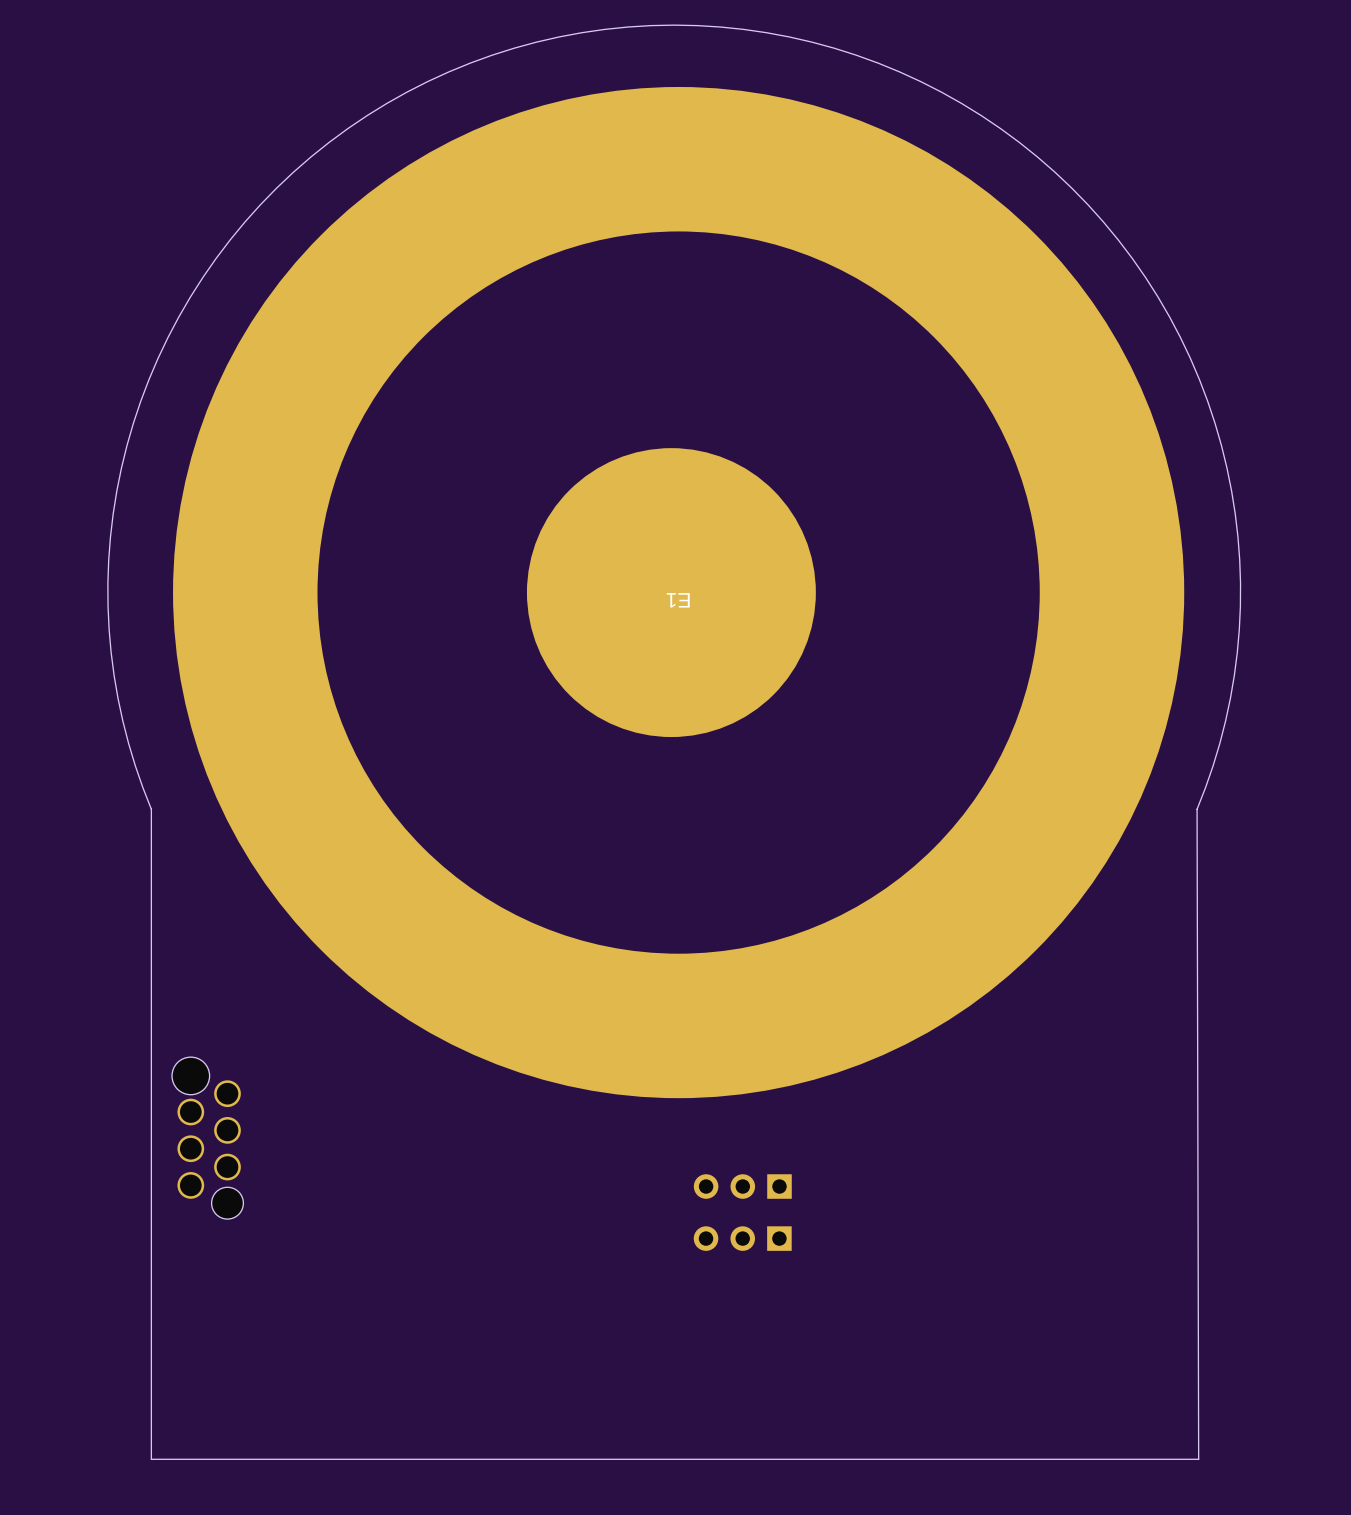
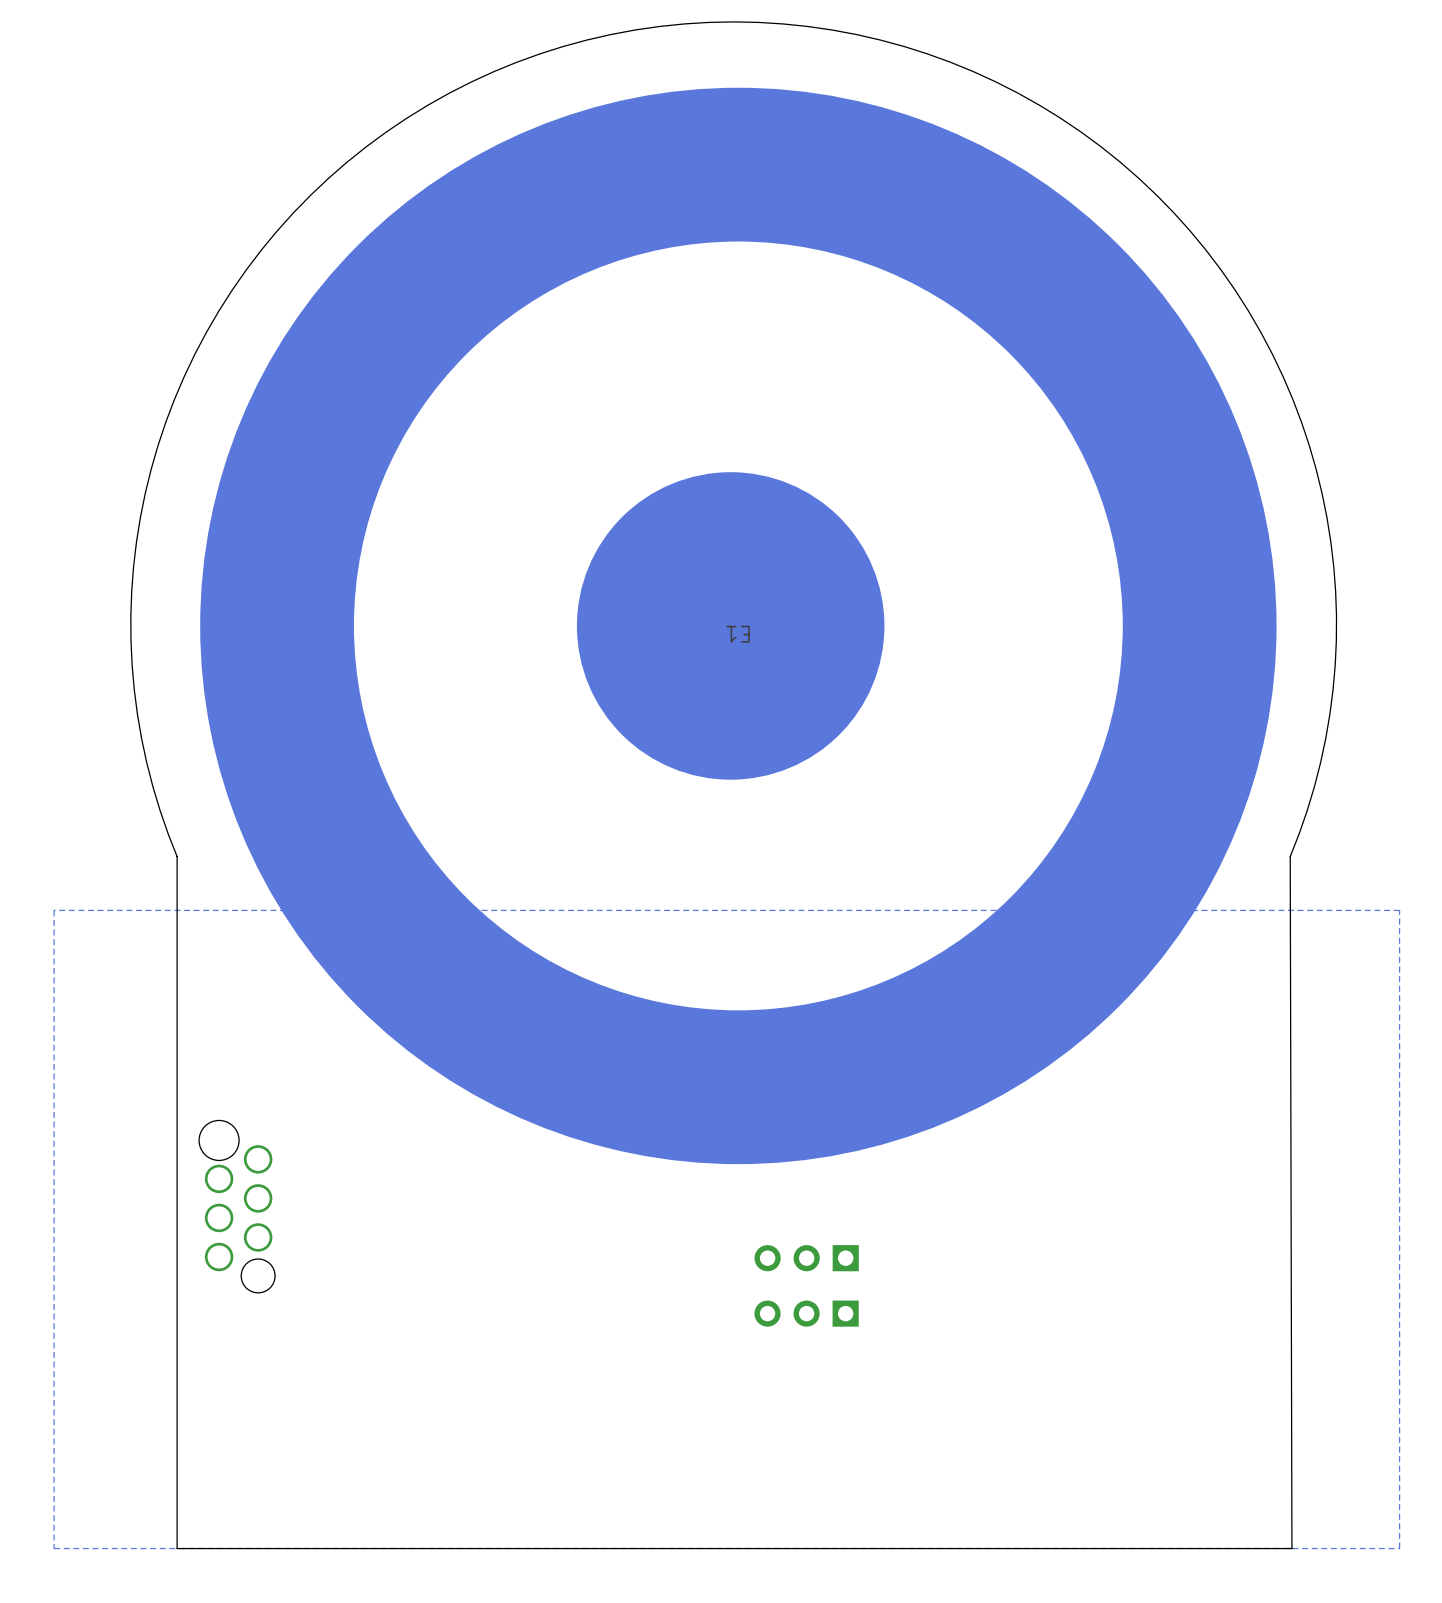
zone outline: none -> (1399, 910) (1399, 1548) (54, 1548) (54, 910) (1399, 910)

